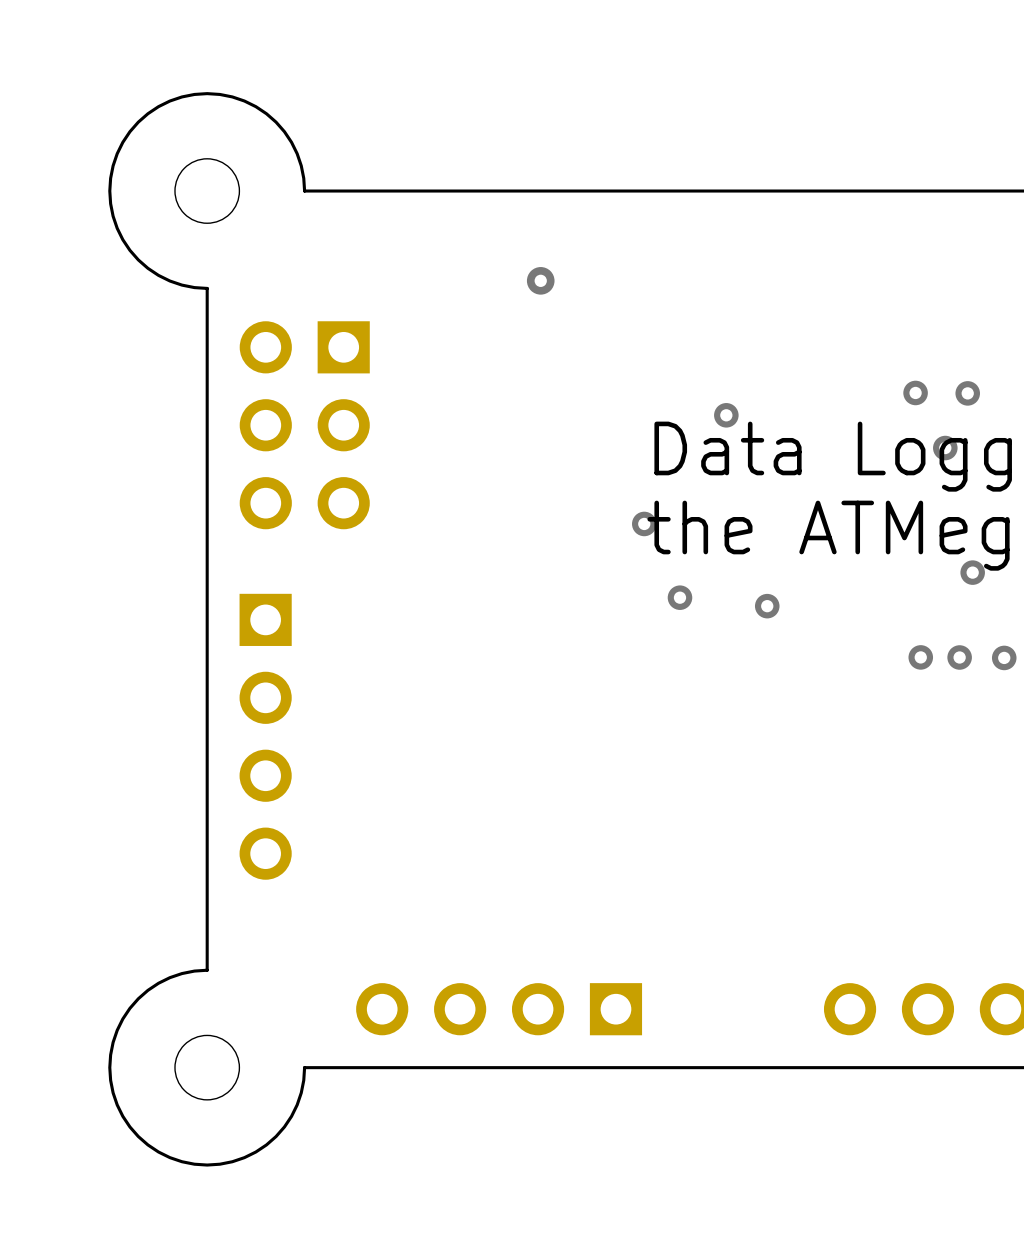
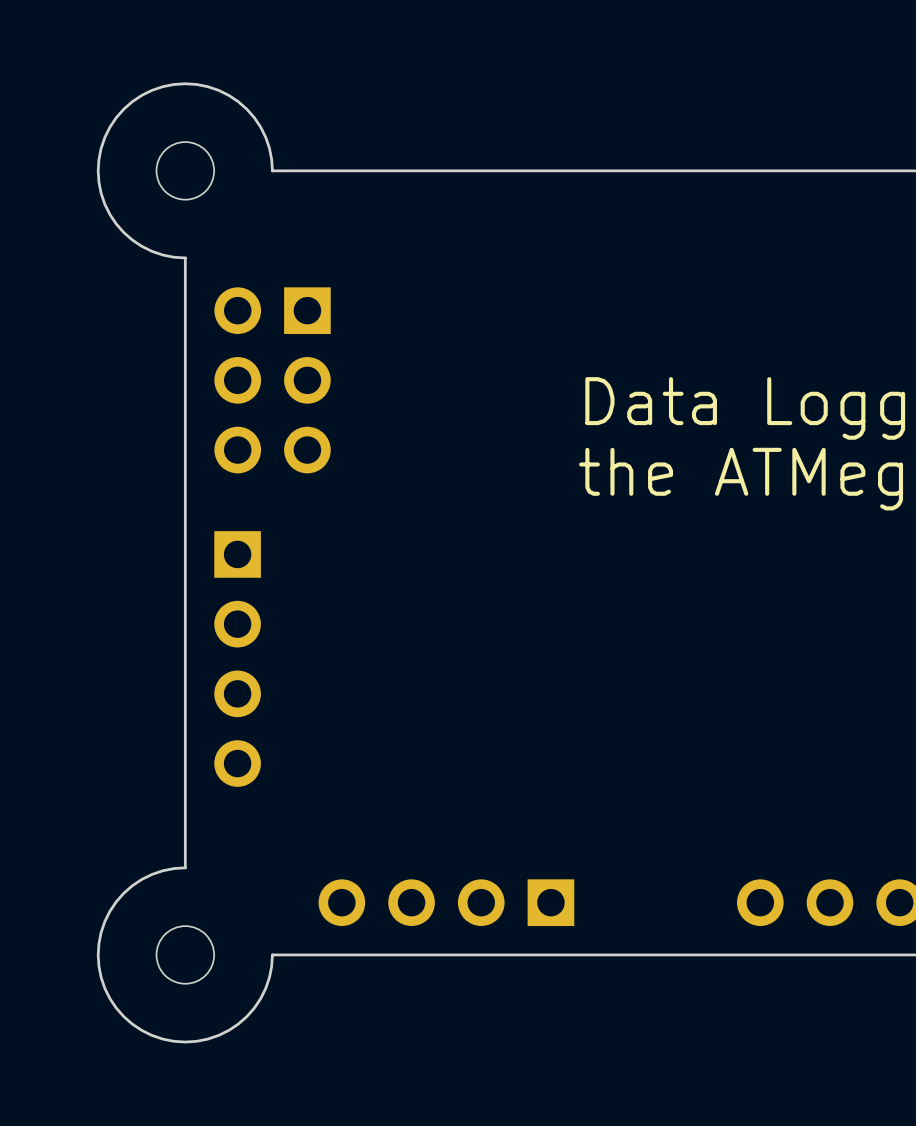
via: (540, 280) -> none
via: (915, 392) -> none
via: (967, 393) -> none
via: (726, 415) -> none
via: (945, 448) -> none
via: (644, 523) -> none
via: (972, 572) -> none
via: (679, 597) -> none
via: (767, 606) -> none
via: (920, 657) -> none
via: (959, 657) -> none
via: (1004, 657) -> none

